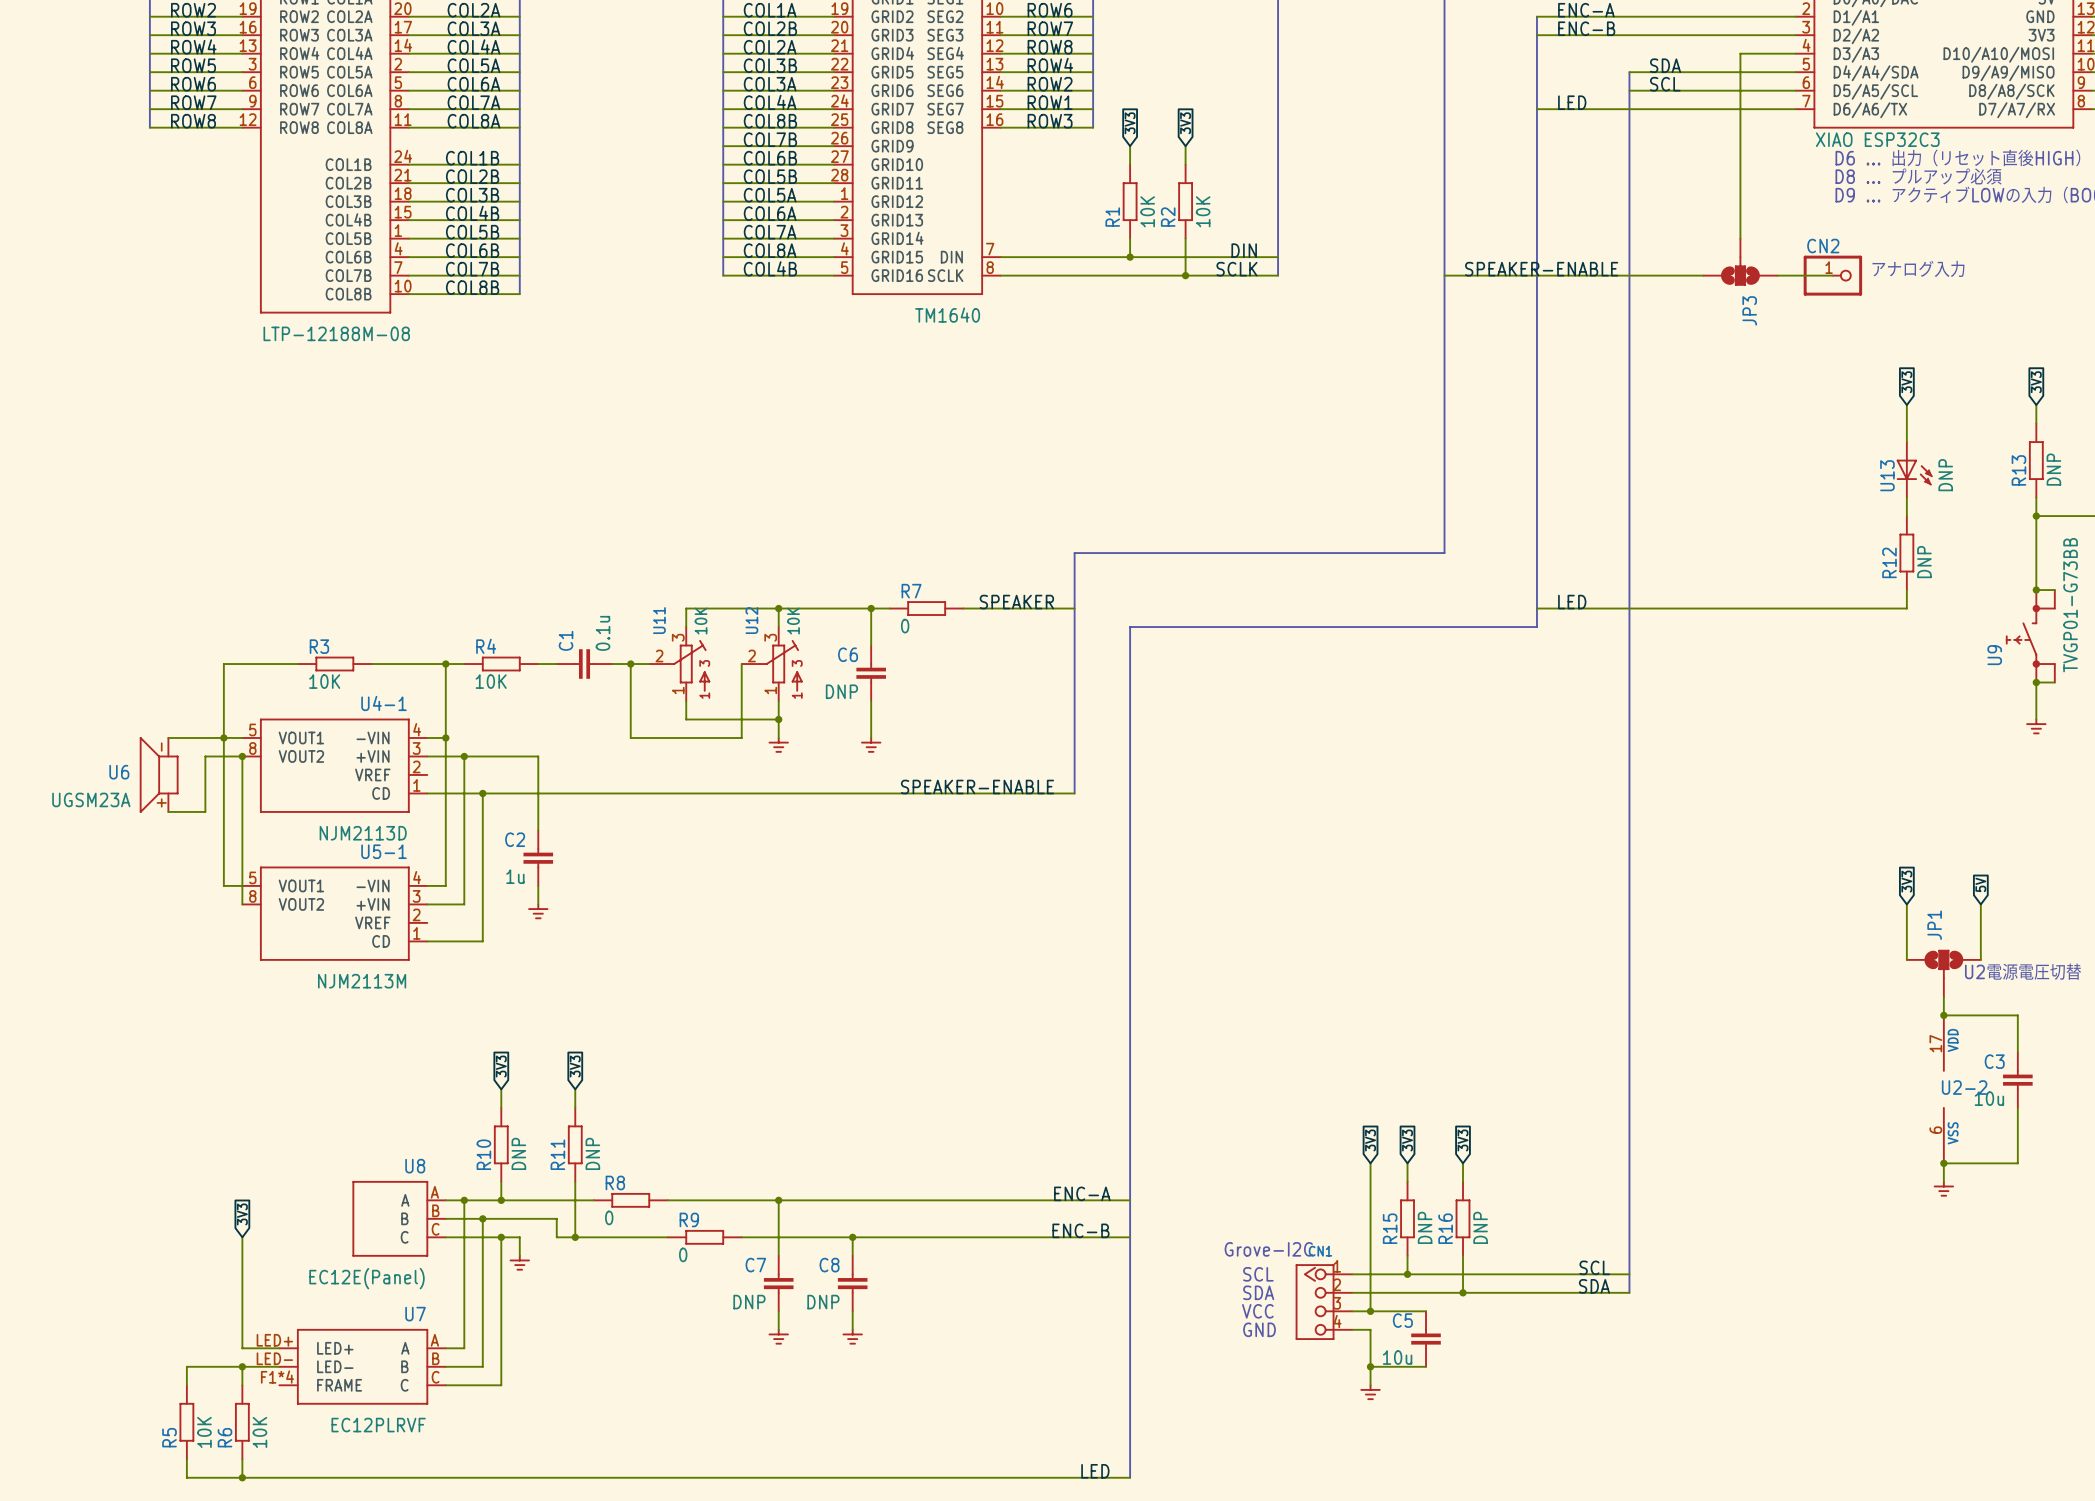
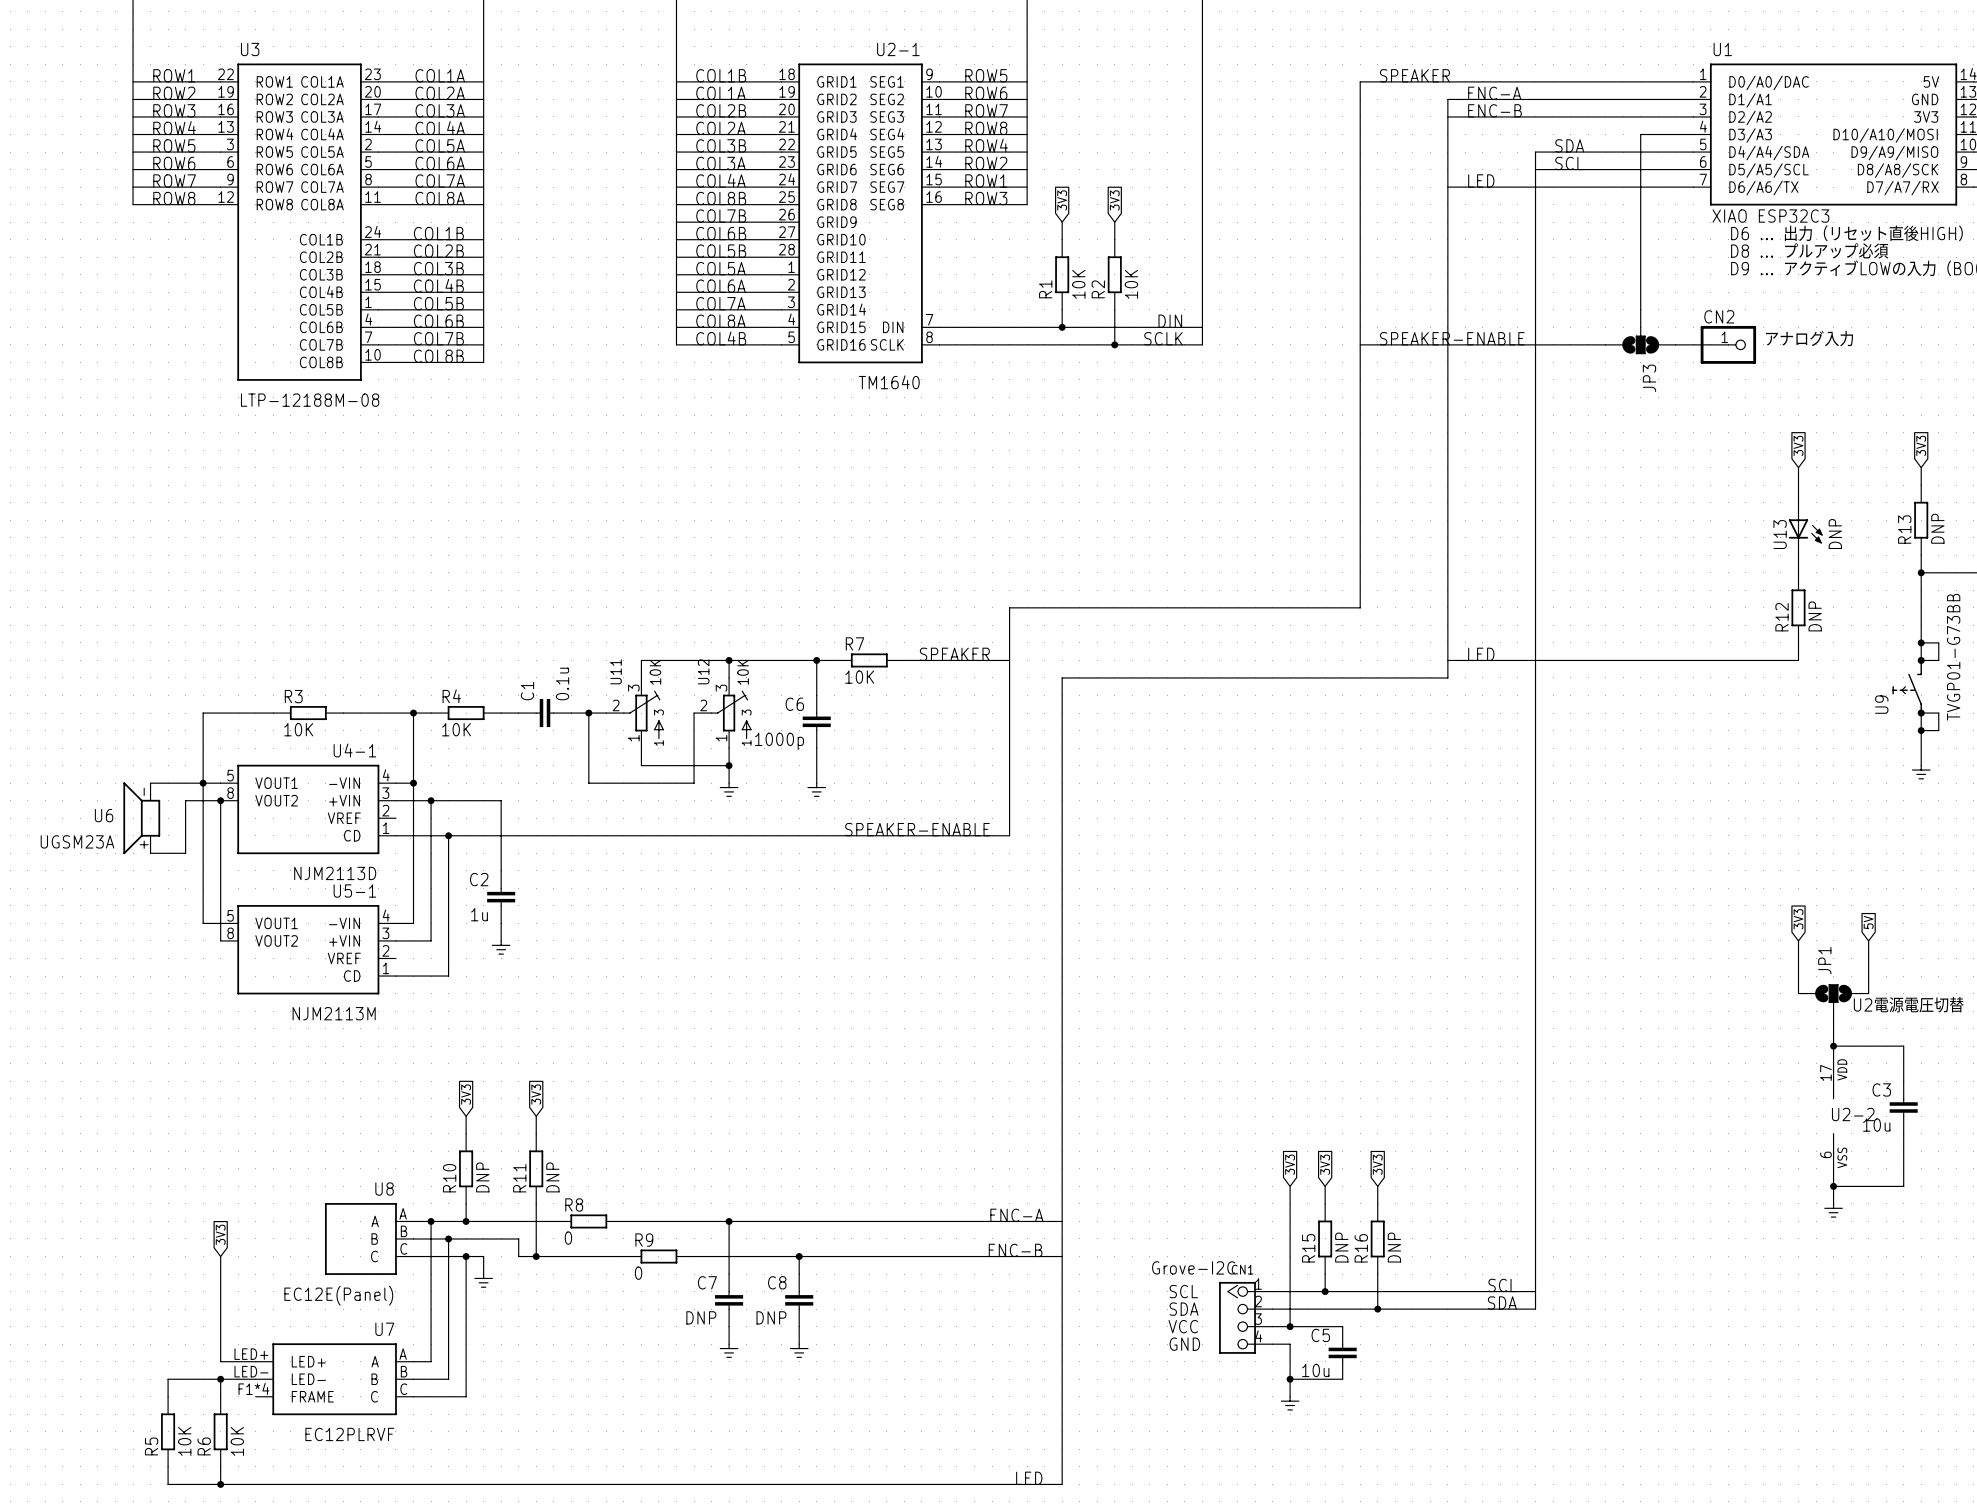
R7 value: 0 (905, 626) -> 10K (859, 677)
C6 value: DNP (841, 691) -> 1000p (779, 741)

